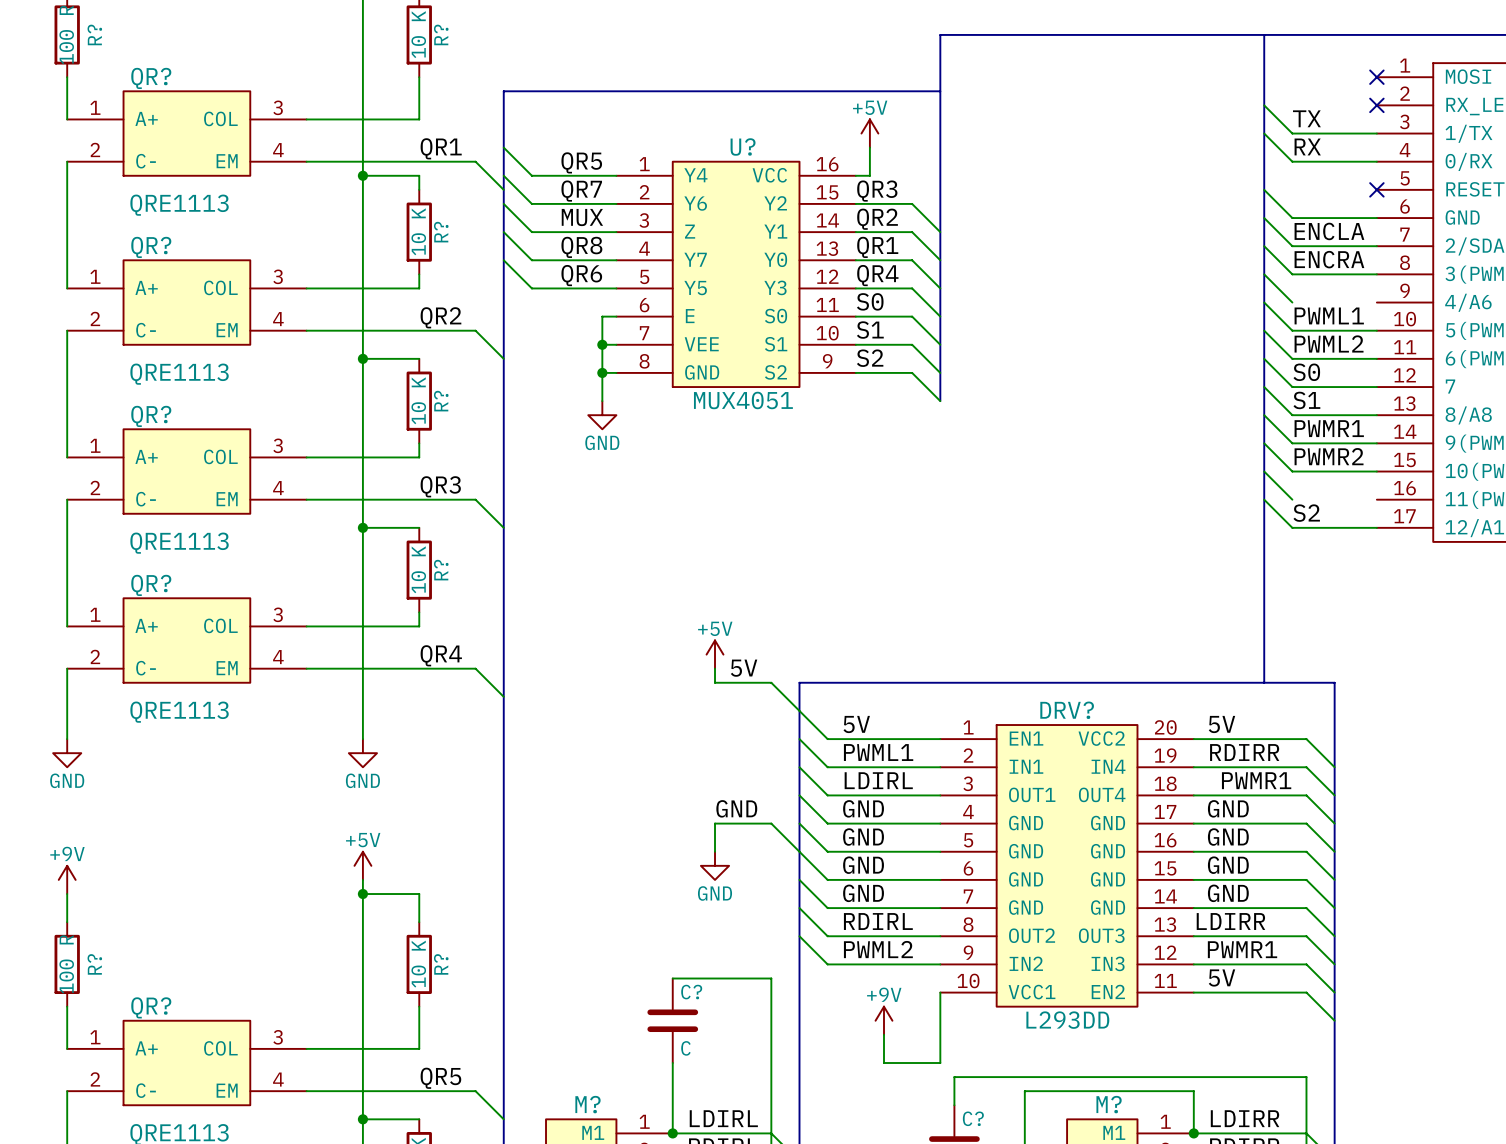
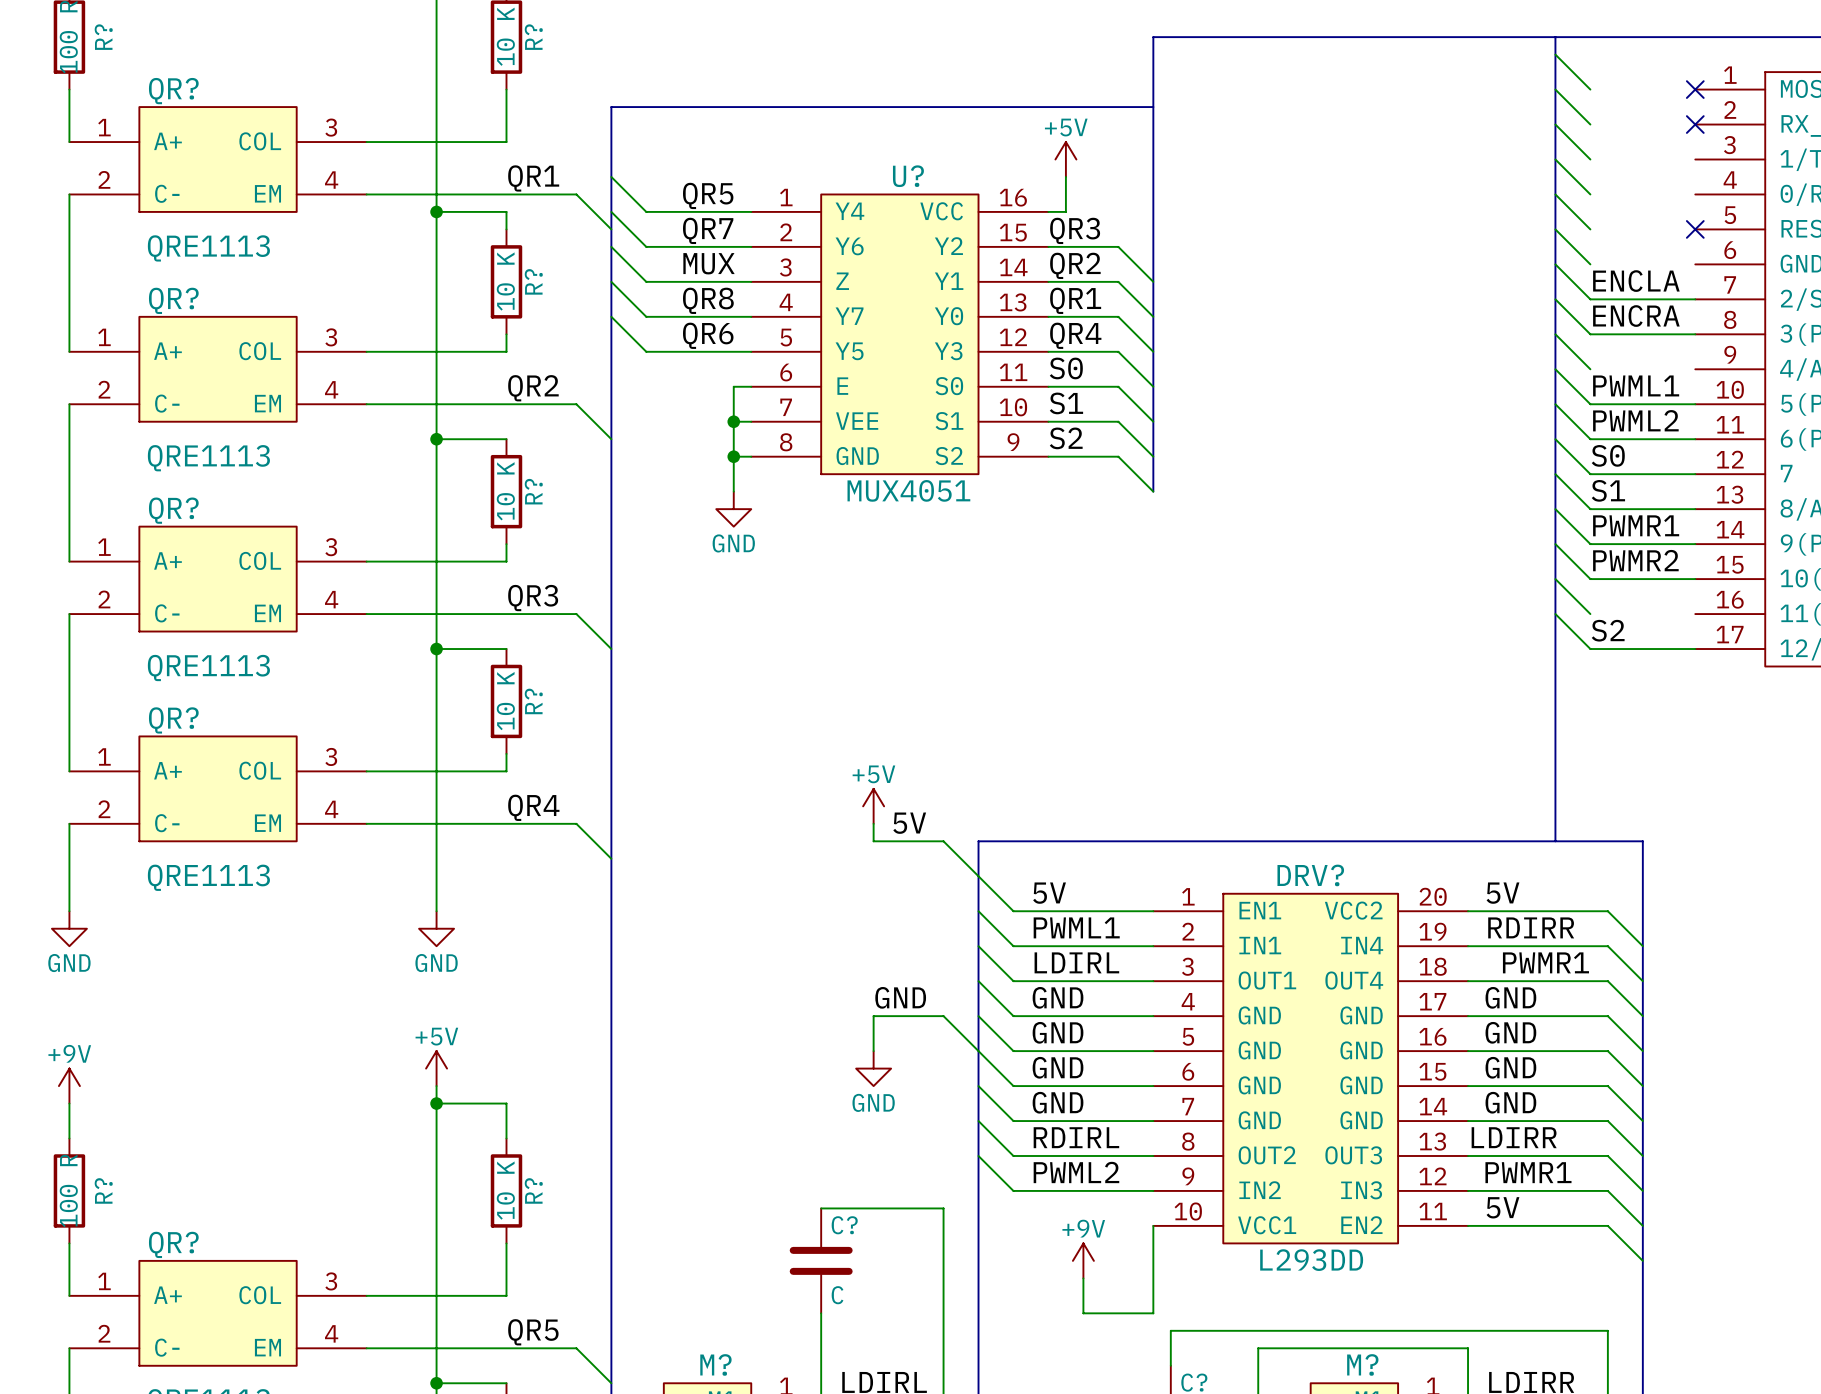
wire: none -> (1555, 54) (1590, 89)
wire: none -> (1555, 89) (1590, 124)
label: TX (1306, 118) -> none
wire: (1292, 133) (1376, 133) -> none
label: RX (1307, 146) -> none
wire: none -> (1555, 194) (1590, 229)
wire: (1292, 161) (1376, 161) -> none
wire: (1292, 218) (1376, 218) -> none

